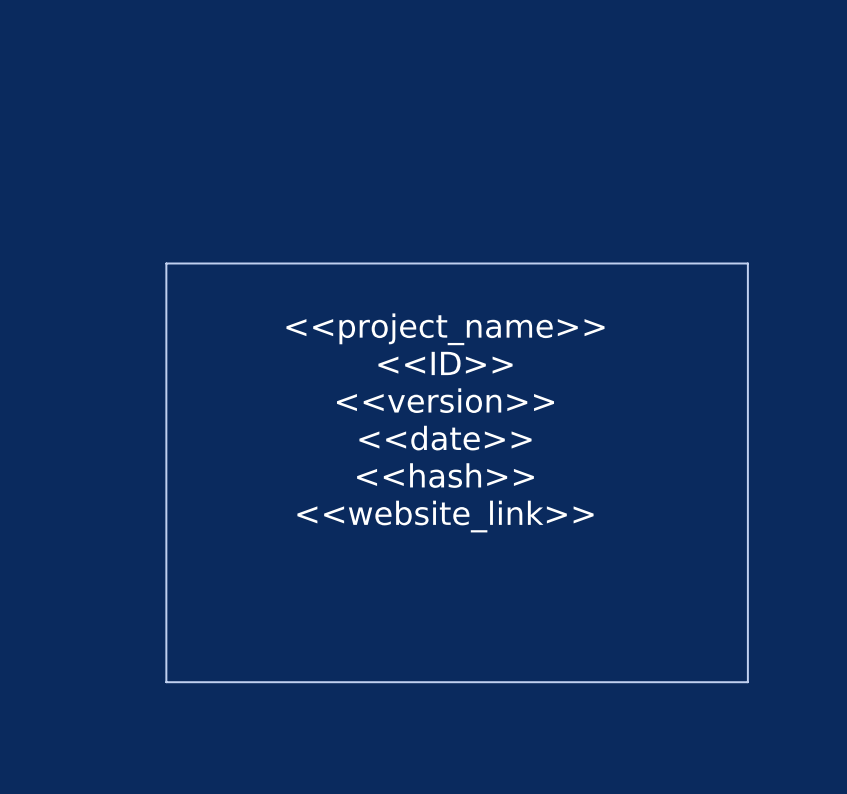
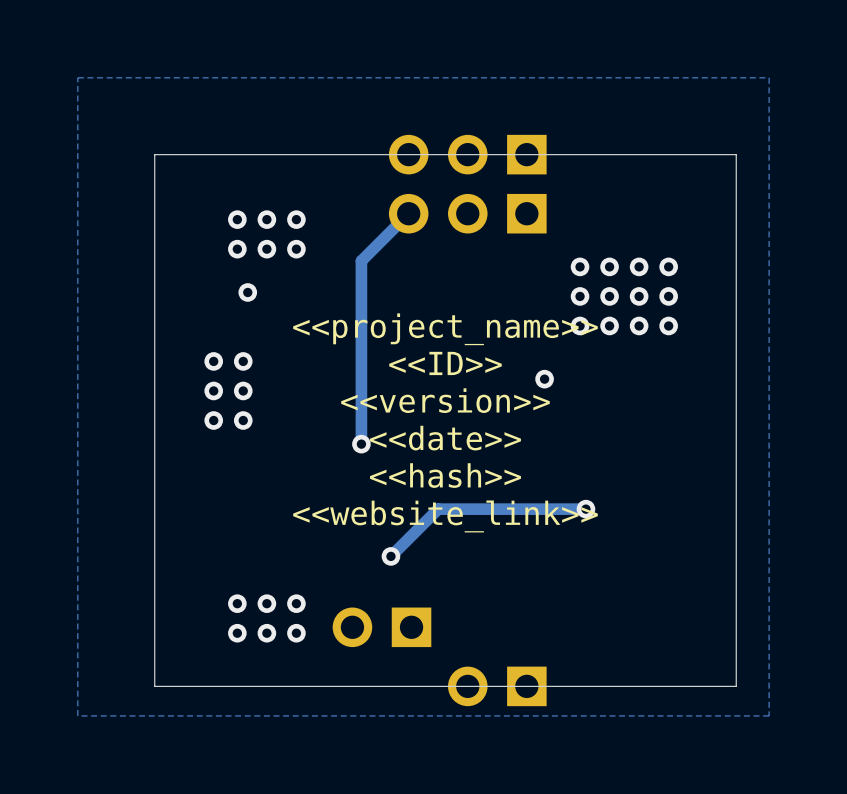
zone outline: none -> (769, 77) (77, 77) (77, 715) (769, 715) (769, 77)
part: none -> (467, 154)
track: none -> (408, 213) (361, 260) (361, 444)
part: none -> (467, 213)
via: none -> (237, 219)
via: none -> (266, 219)
via: none -> (296, 219)
via: none -> (237, 249)
via: none -> (266, 249)
via: none -> (296, 249)
board edge: (747, 263) (166, 263) (166, 682) (747, 682) (747, 263) -> (736, 154) (736, 686) (154, 686) (154, 154) (736, 154)
via: none -> (580, 266)
via: none -> (609, 266)
via: none -> (639, 266)
via: none -> (668, 266)
via: none -> (247, 292)
via: none -> (580, 296)
via: none -> (609, 296)
via: none -> (639, 296)
via: none -> (668, 296)
via: none -> (580, 325)
via: none -> (609, 325)
via: none -> (639, 325)
via: none -> (668, 325)
via: none -> (213, 361)
via: none -> (243, 361)
via: none -> (544, 379)
via: none -> (213, 390)
via: none -> (243, 390)
via: none -> (213, 420)
via: none -> (243, 420)
via: none -> (361, 444)
track: none -> (585, 509) (438, 509) (390, 556)
via: none -> (585, 509)
via: none -> (390, 556)
via: none -> (237, 603)
via: none -> (266, 603)
via: none -> (296, 603)
part: none -> (381, 627)
via: none -> (237, 633)
via: none -> (266, 633)
via: none -> (296, 633)
part: none -> (497, 686)

